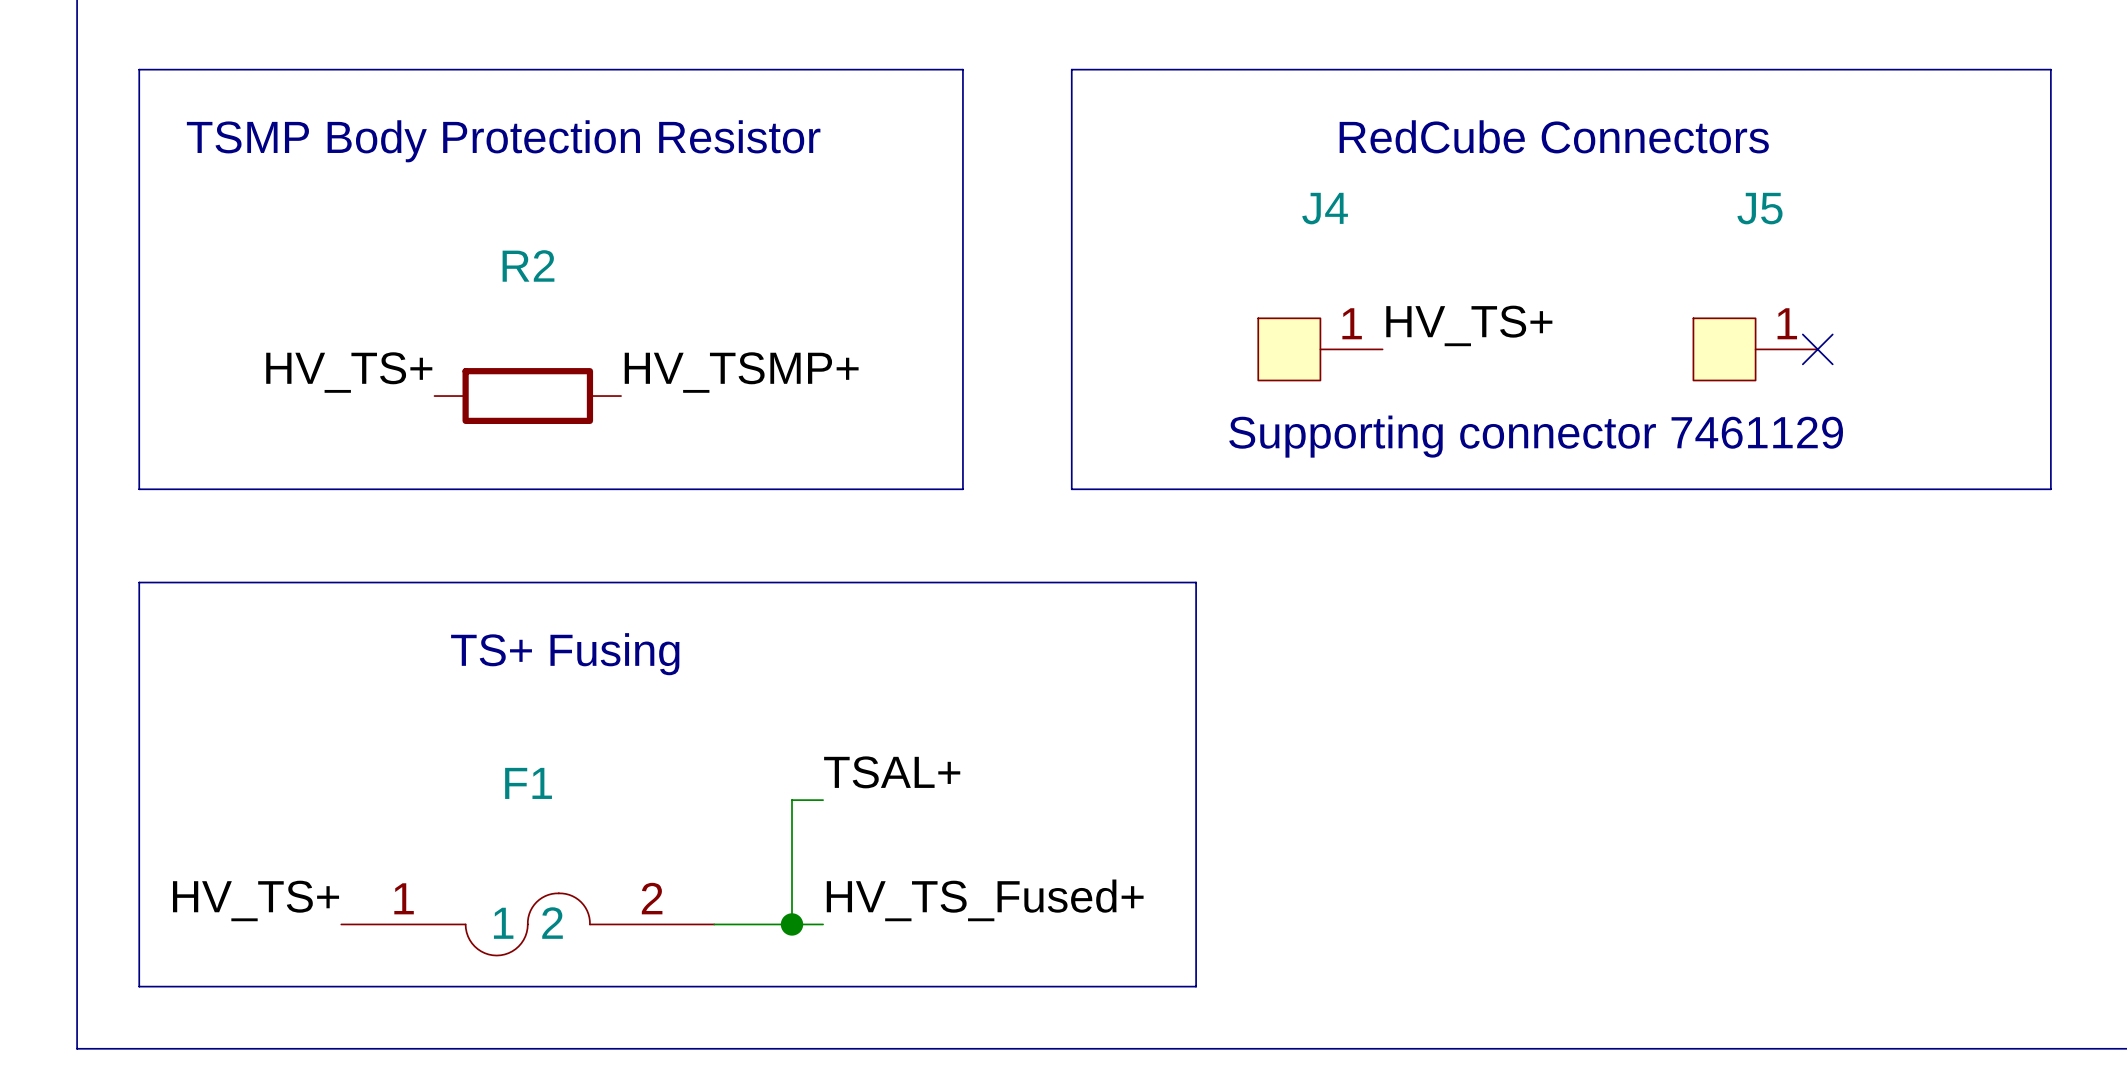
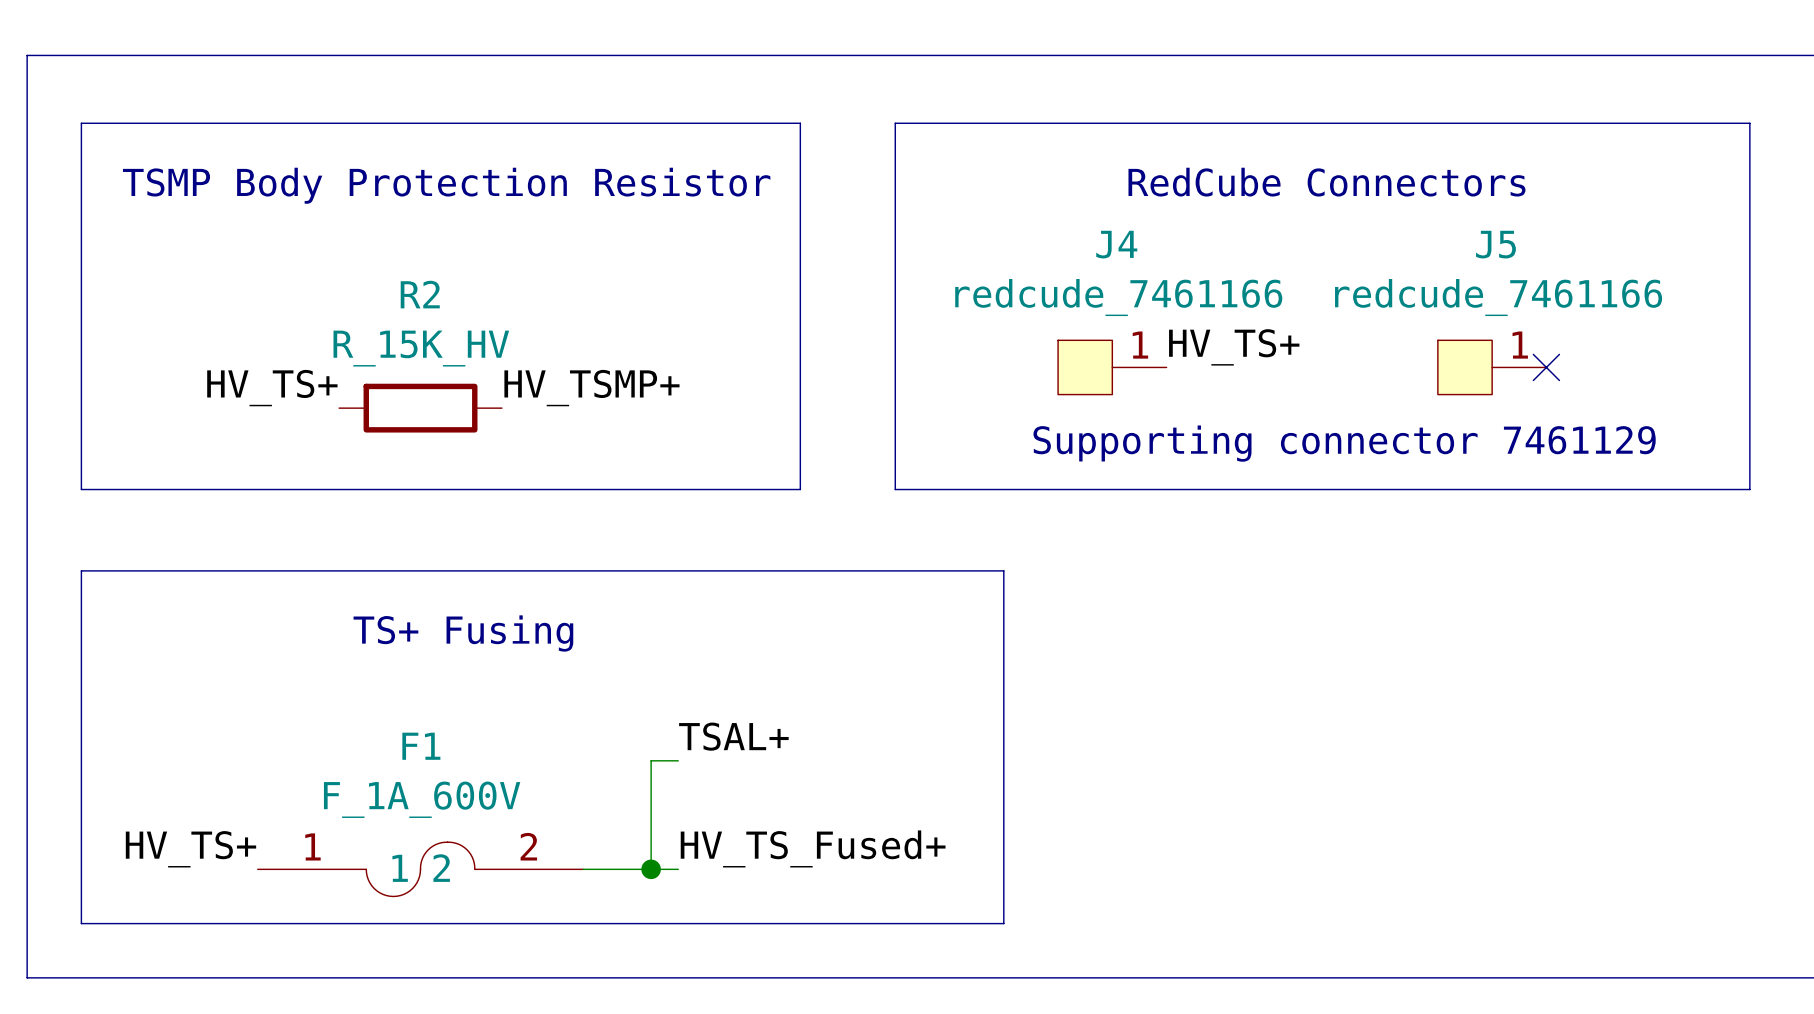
J4 value: none -> redcude_7461166 (1118, 297)
J5 value: none -> redcude_7461166 (1498, 297)
R2 value: none -> R_15K_HV (421, 348)
F1 value: none -> F_1A_600V (422, 799)

